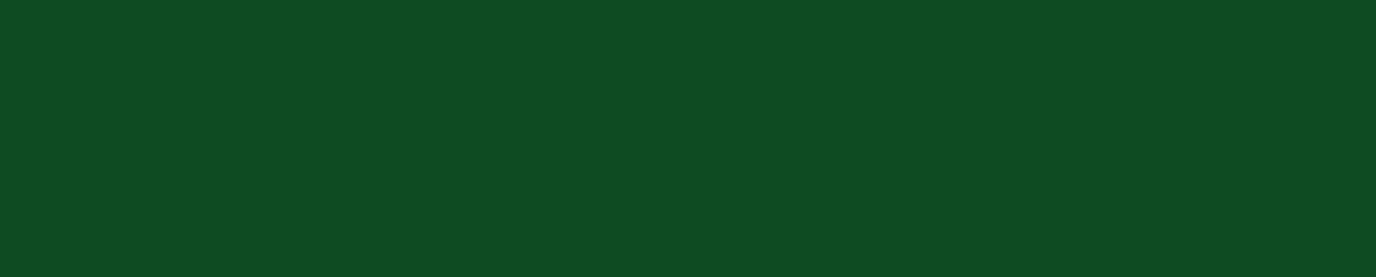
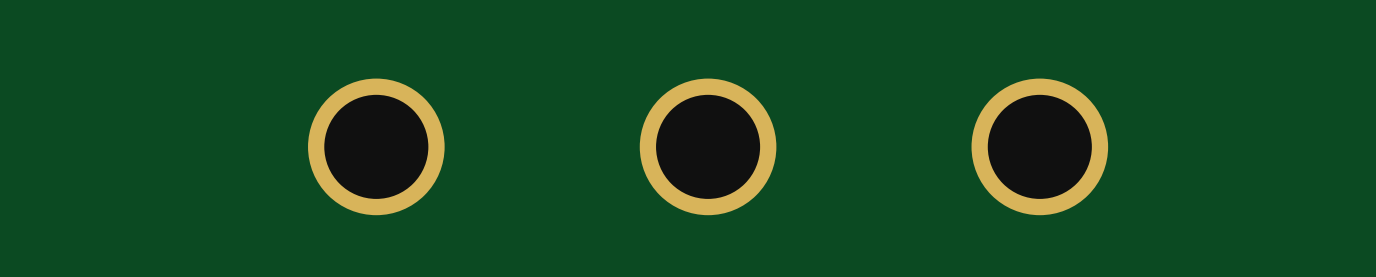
part: none -> (376, 146)
part: none -> (708, 146)
part: none -> (1039, 146)

